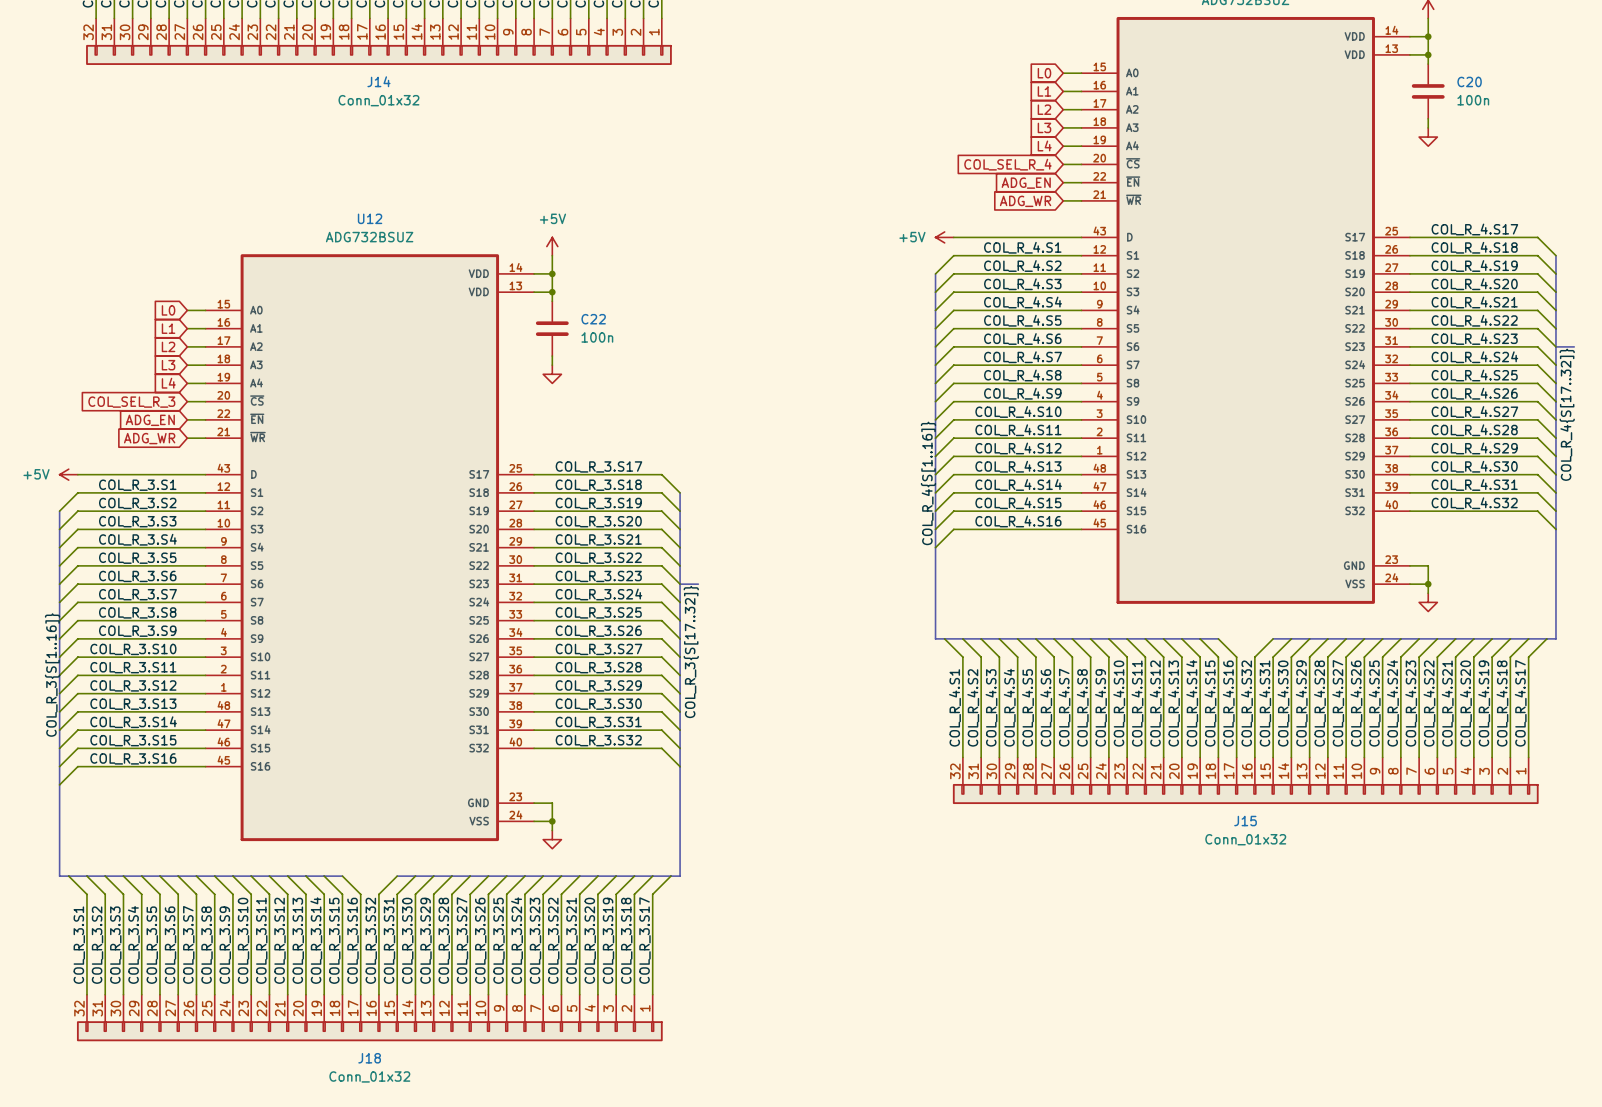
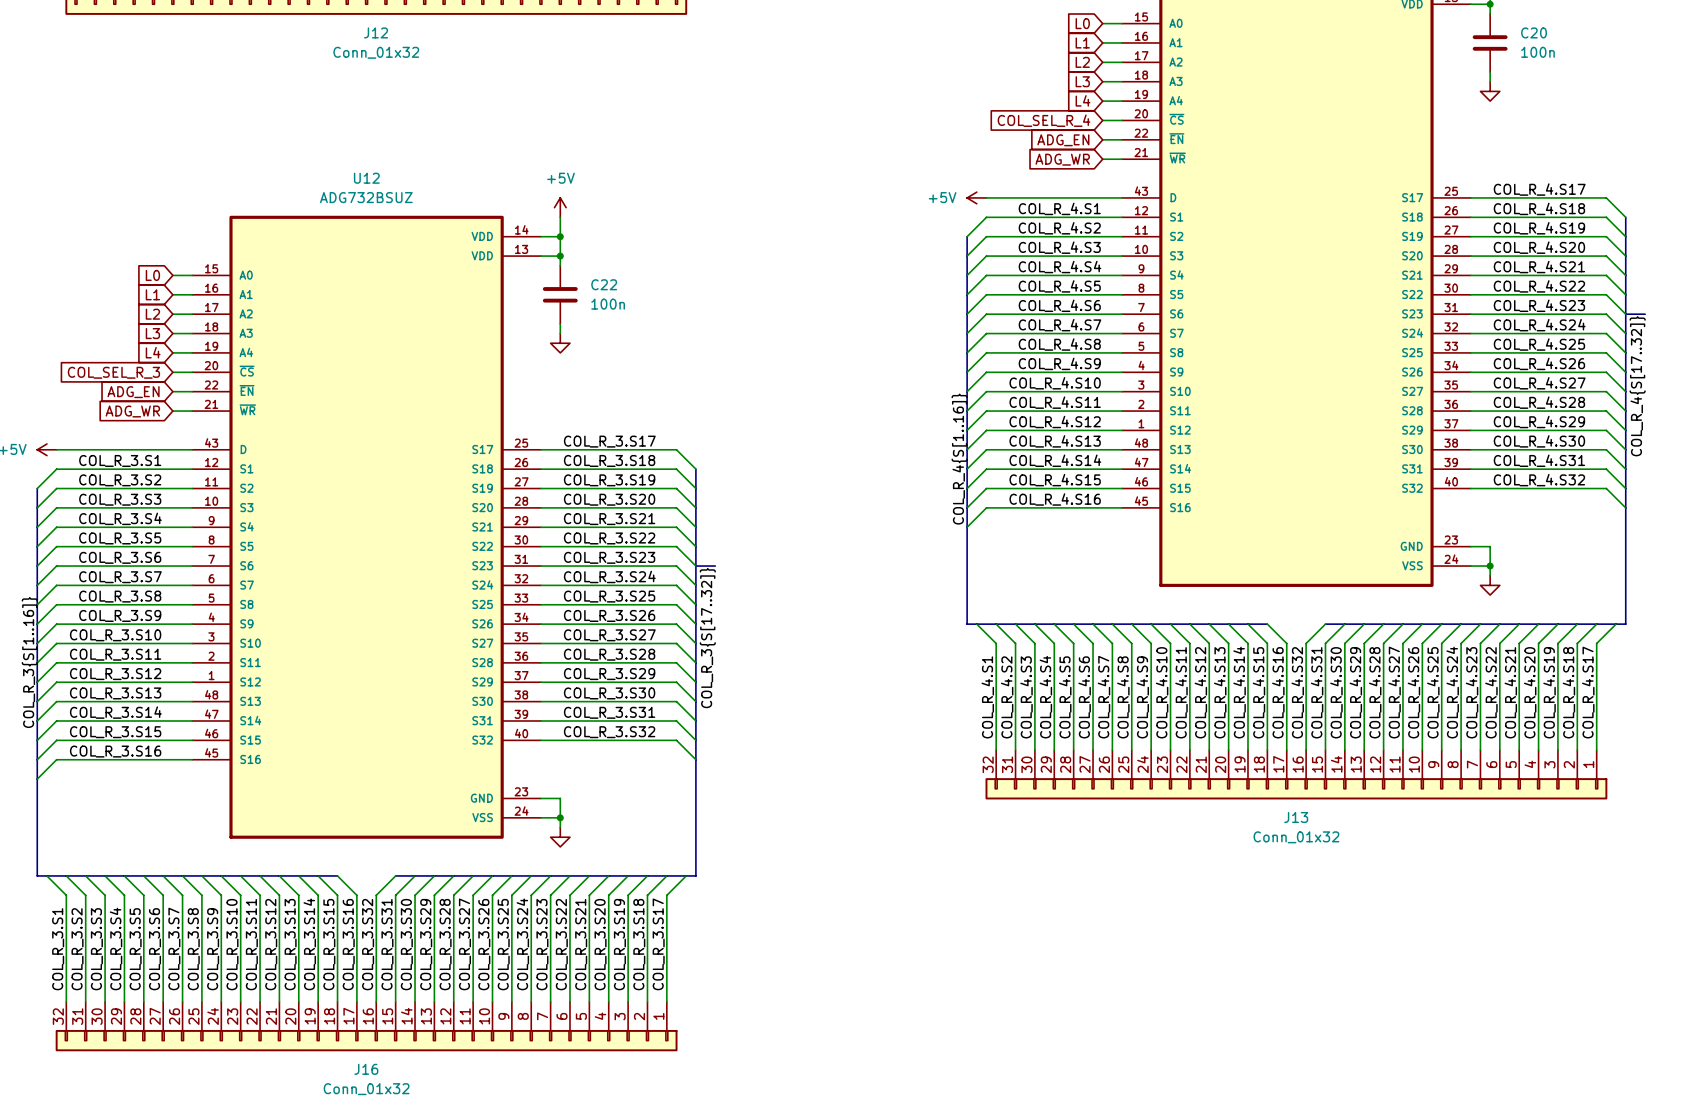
J14 name: J14 (378, 81) -> J12 (376, 32)
J15 name: J15 (1245, 821) -> J13 (1296, 817)
J18 name: J18 (369, 1058) -> J16 (366, 1069)

